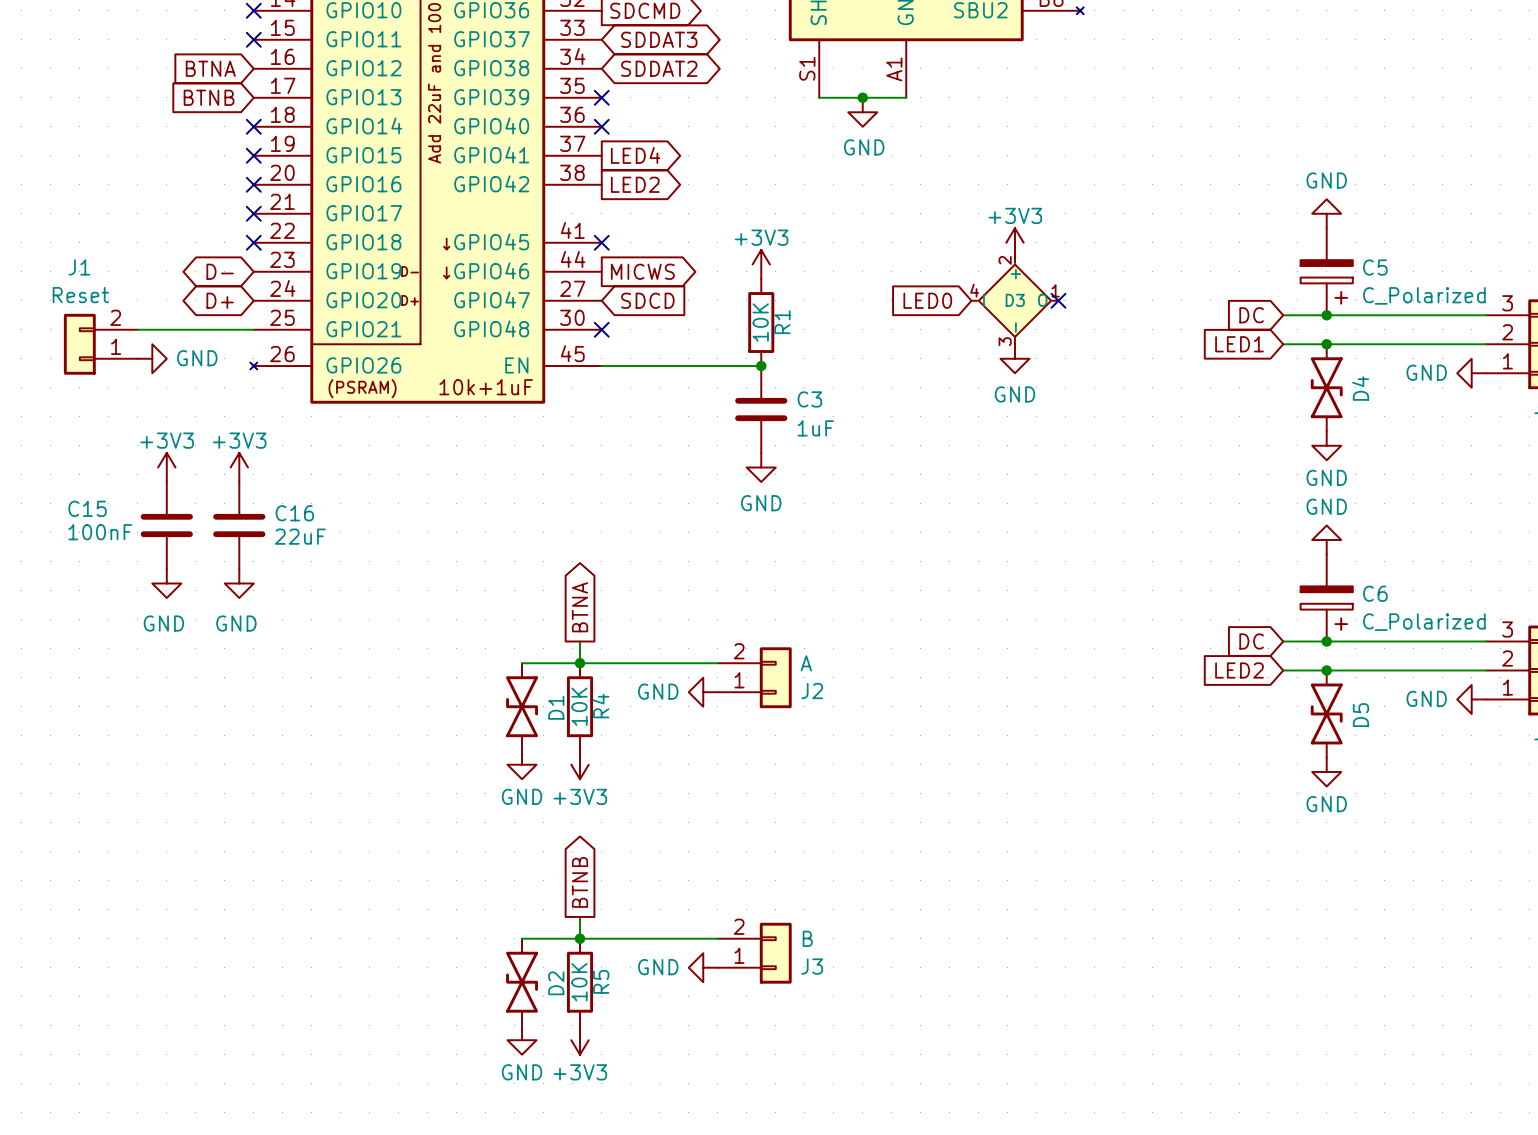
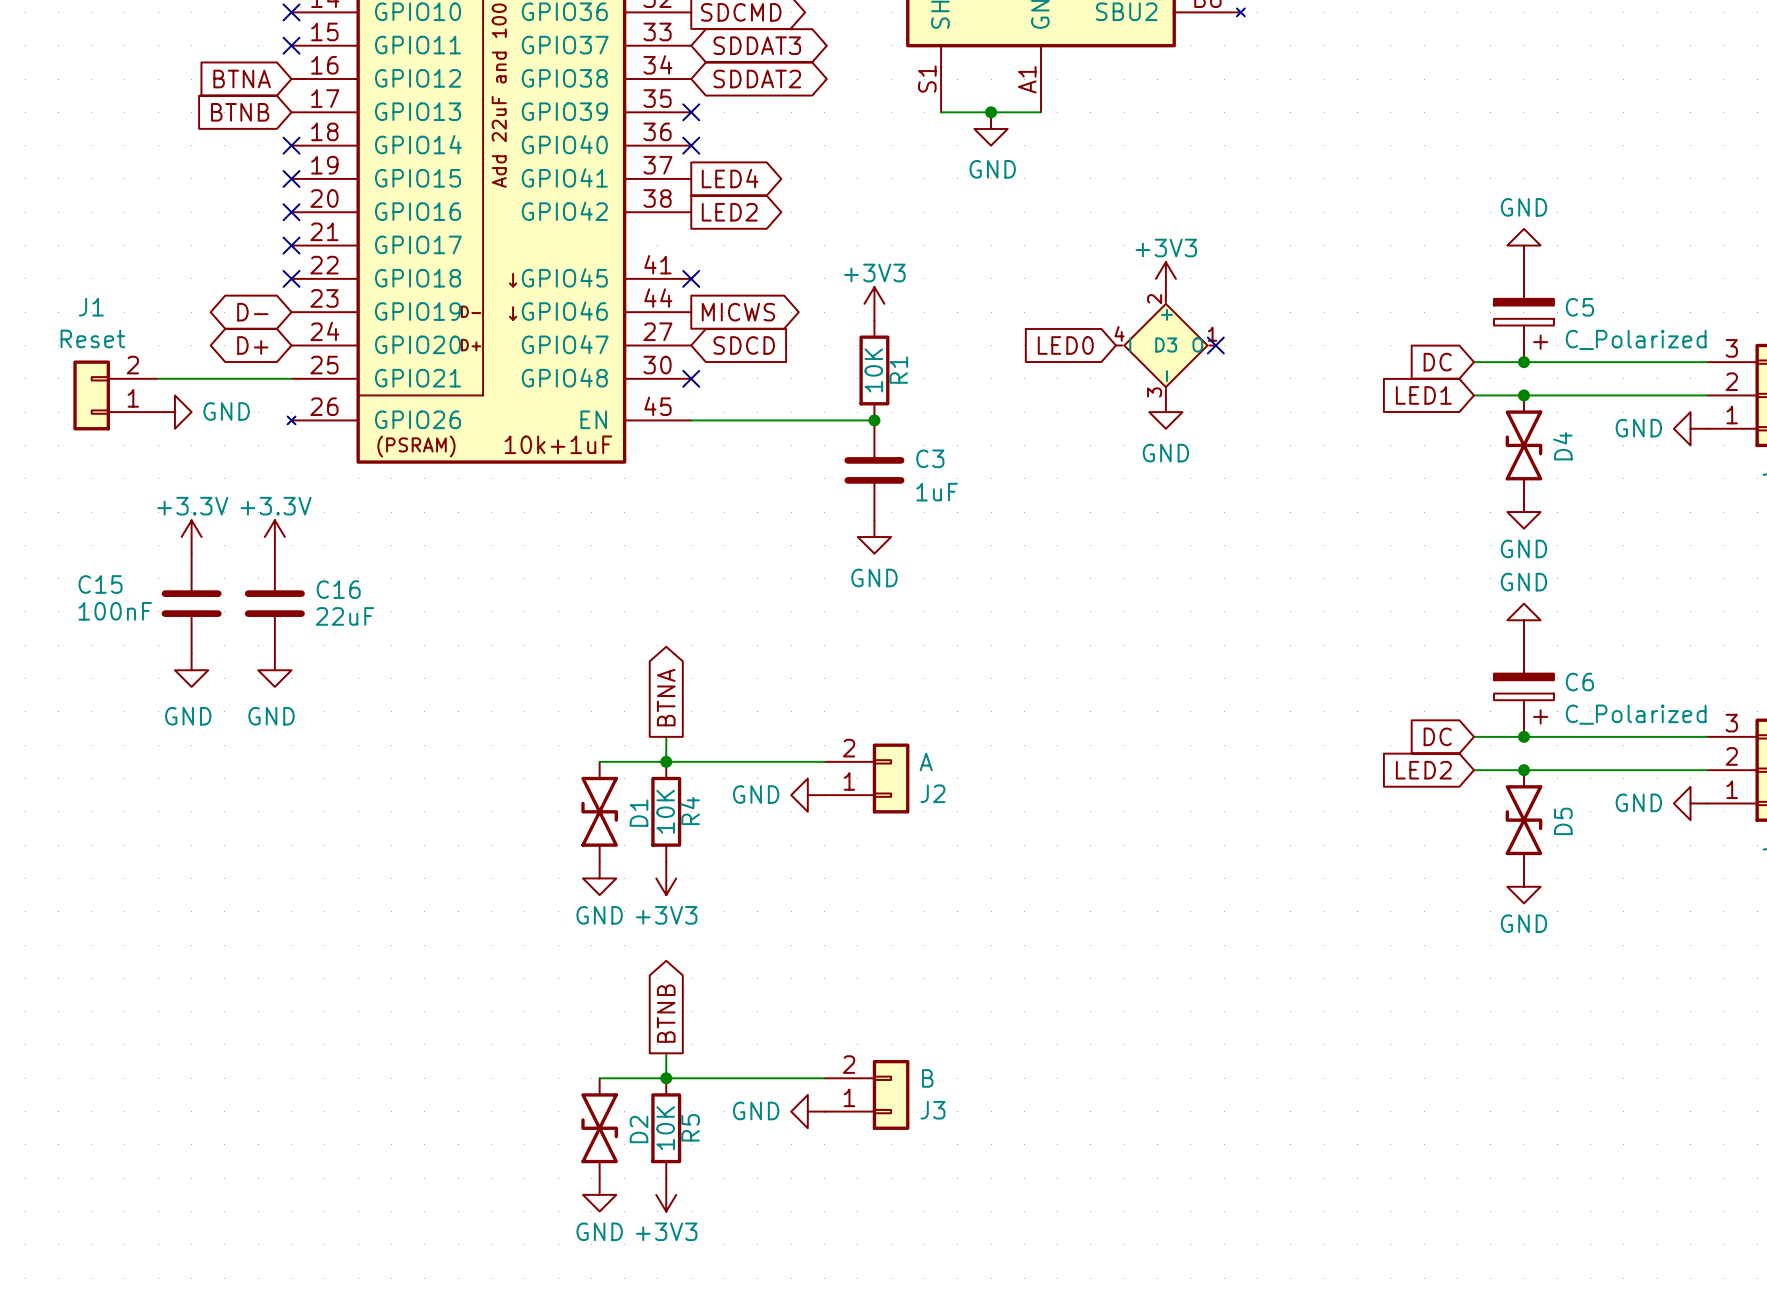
power symbol: +3V3 (166, 467) -> +3.3V (191, 537)
power symbol: +3V3 (239, 467) -> +3.3V (274, 537)

